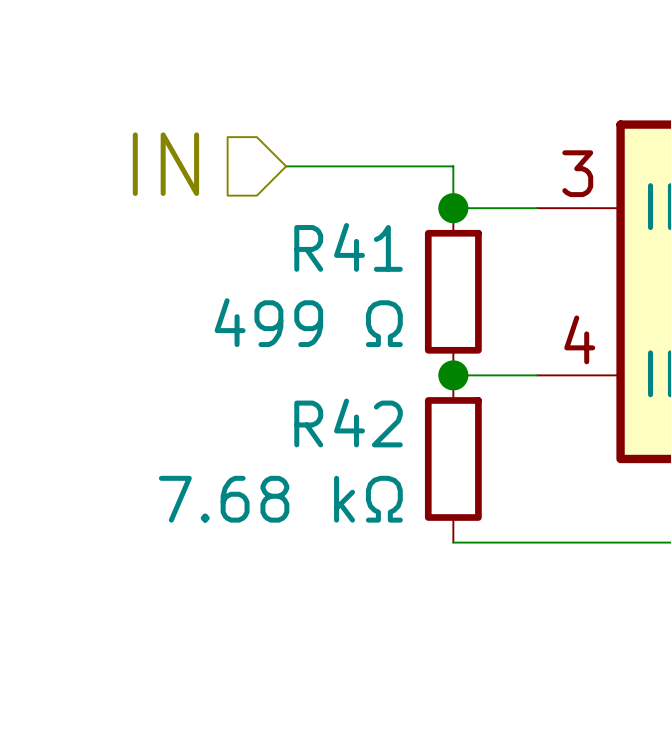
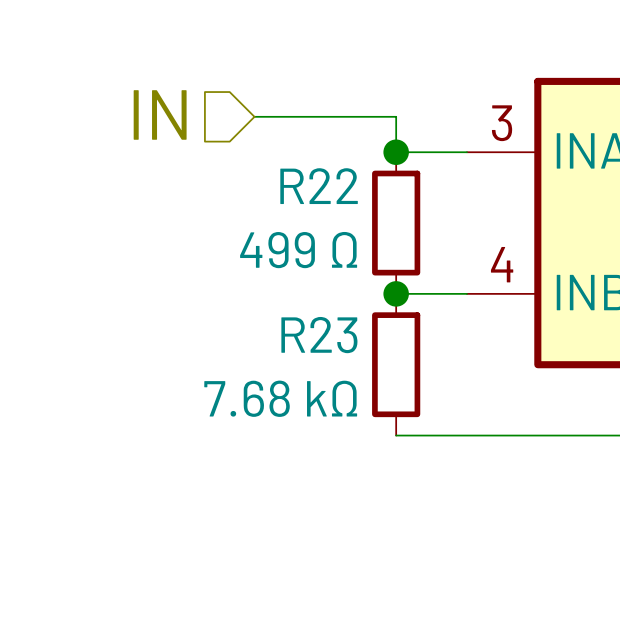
R41 name: R41 (348, 247) -> R22 (319, 186)
R42 name: R42 (348, 422) -> R23 (319, 335)

